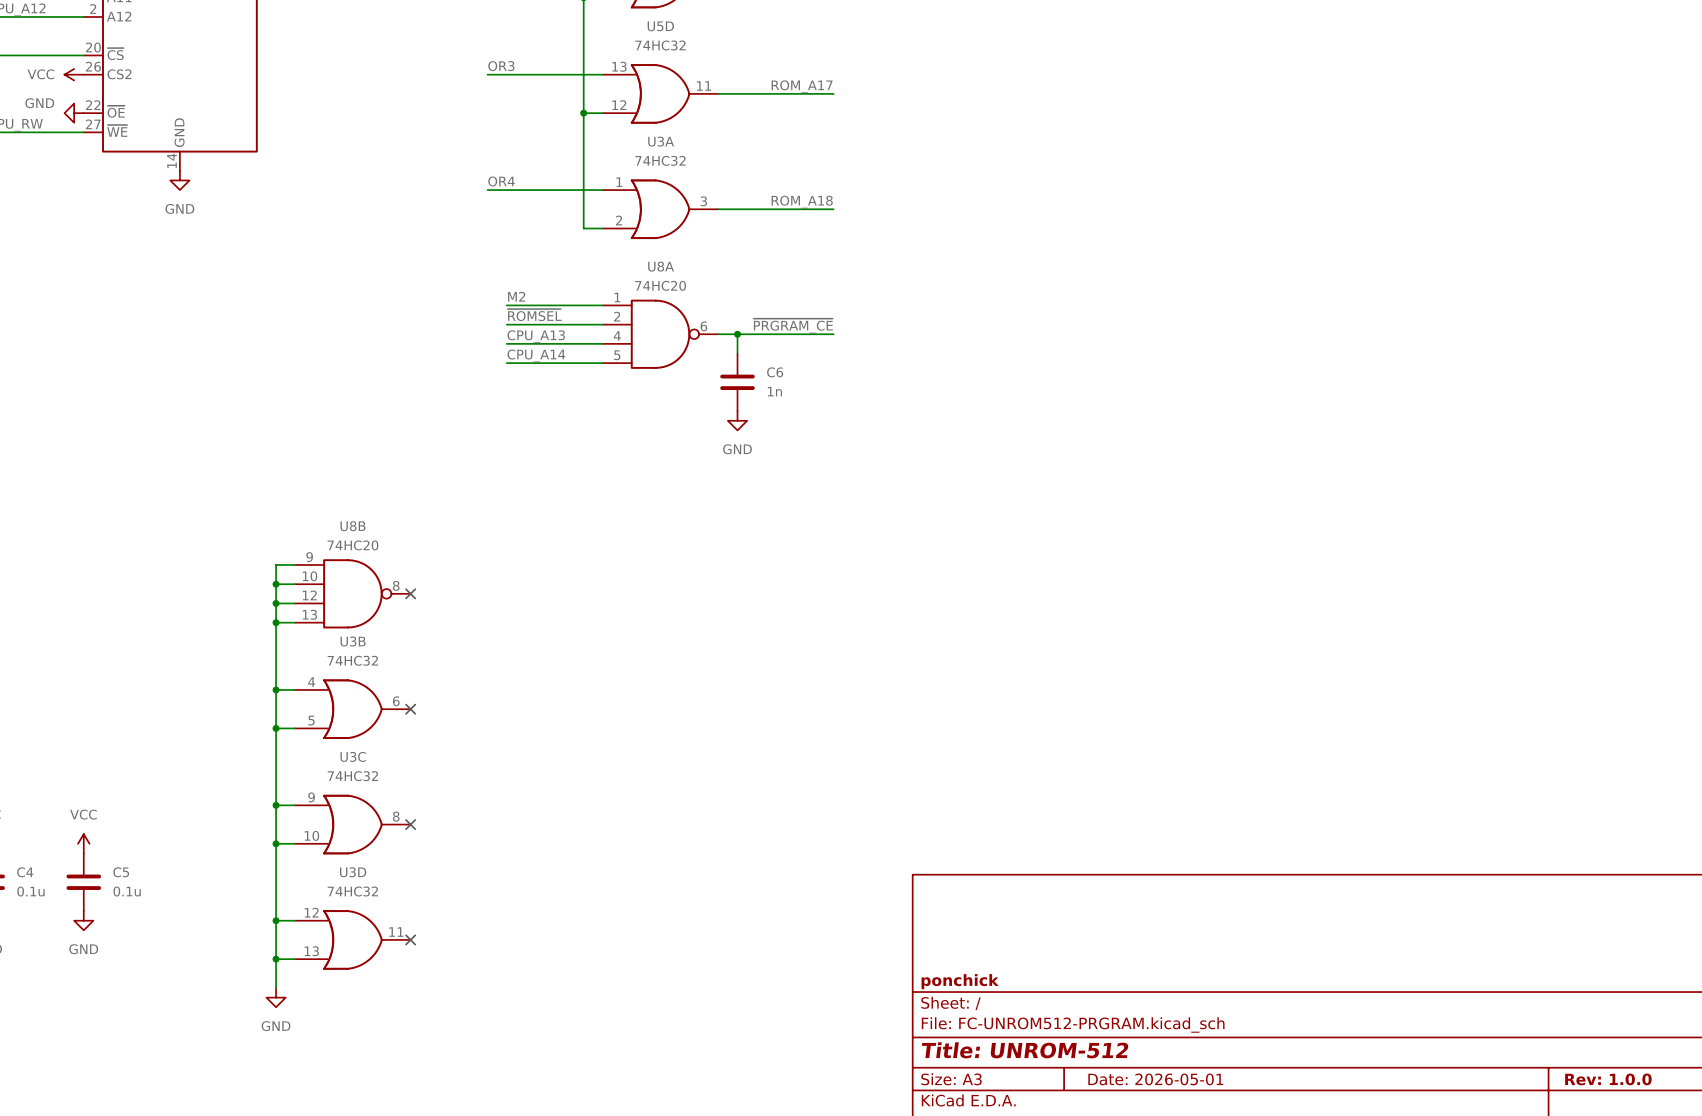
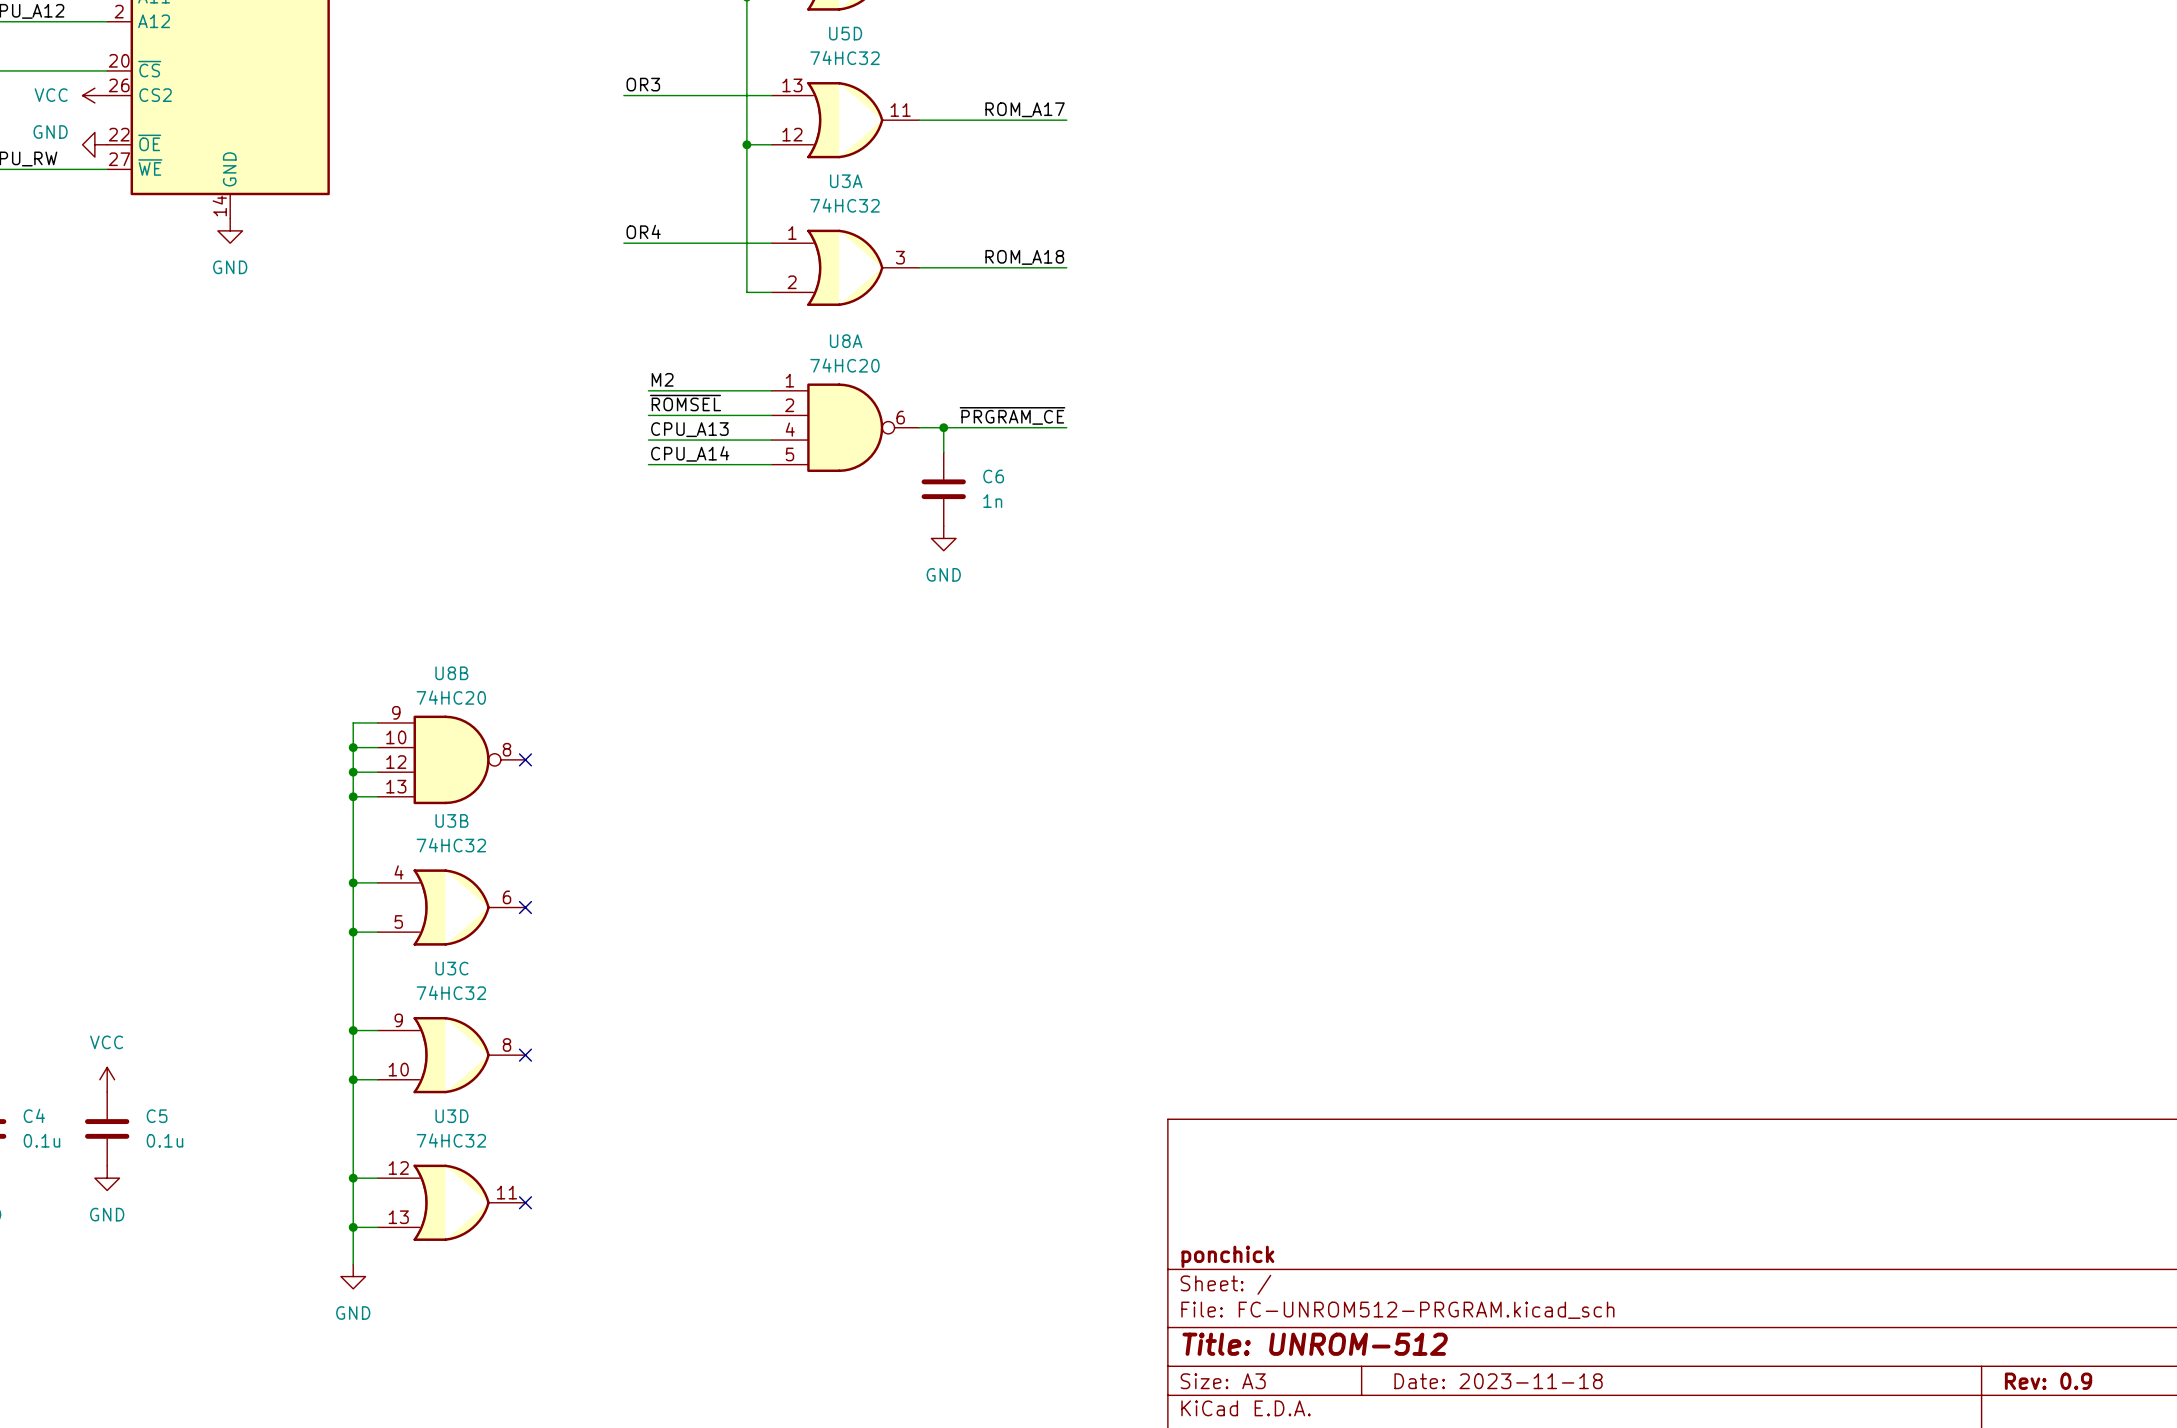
title block: Date: 2026-05-01 (1155, 1079) -> Date: 2023-11-18 (1498, 1381)
title block: Rev: 1.0.0 (1608, 1079) -> Rev: 0.9 (2048, 1381)

